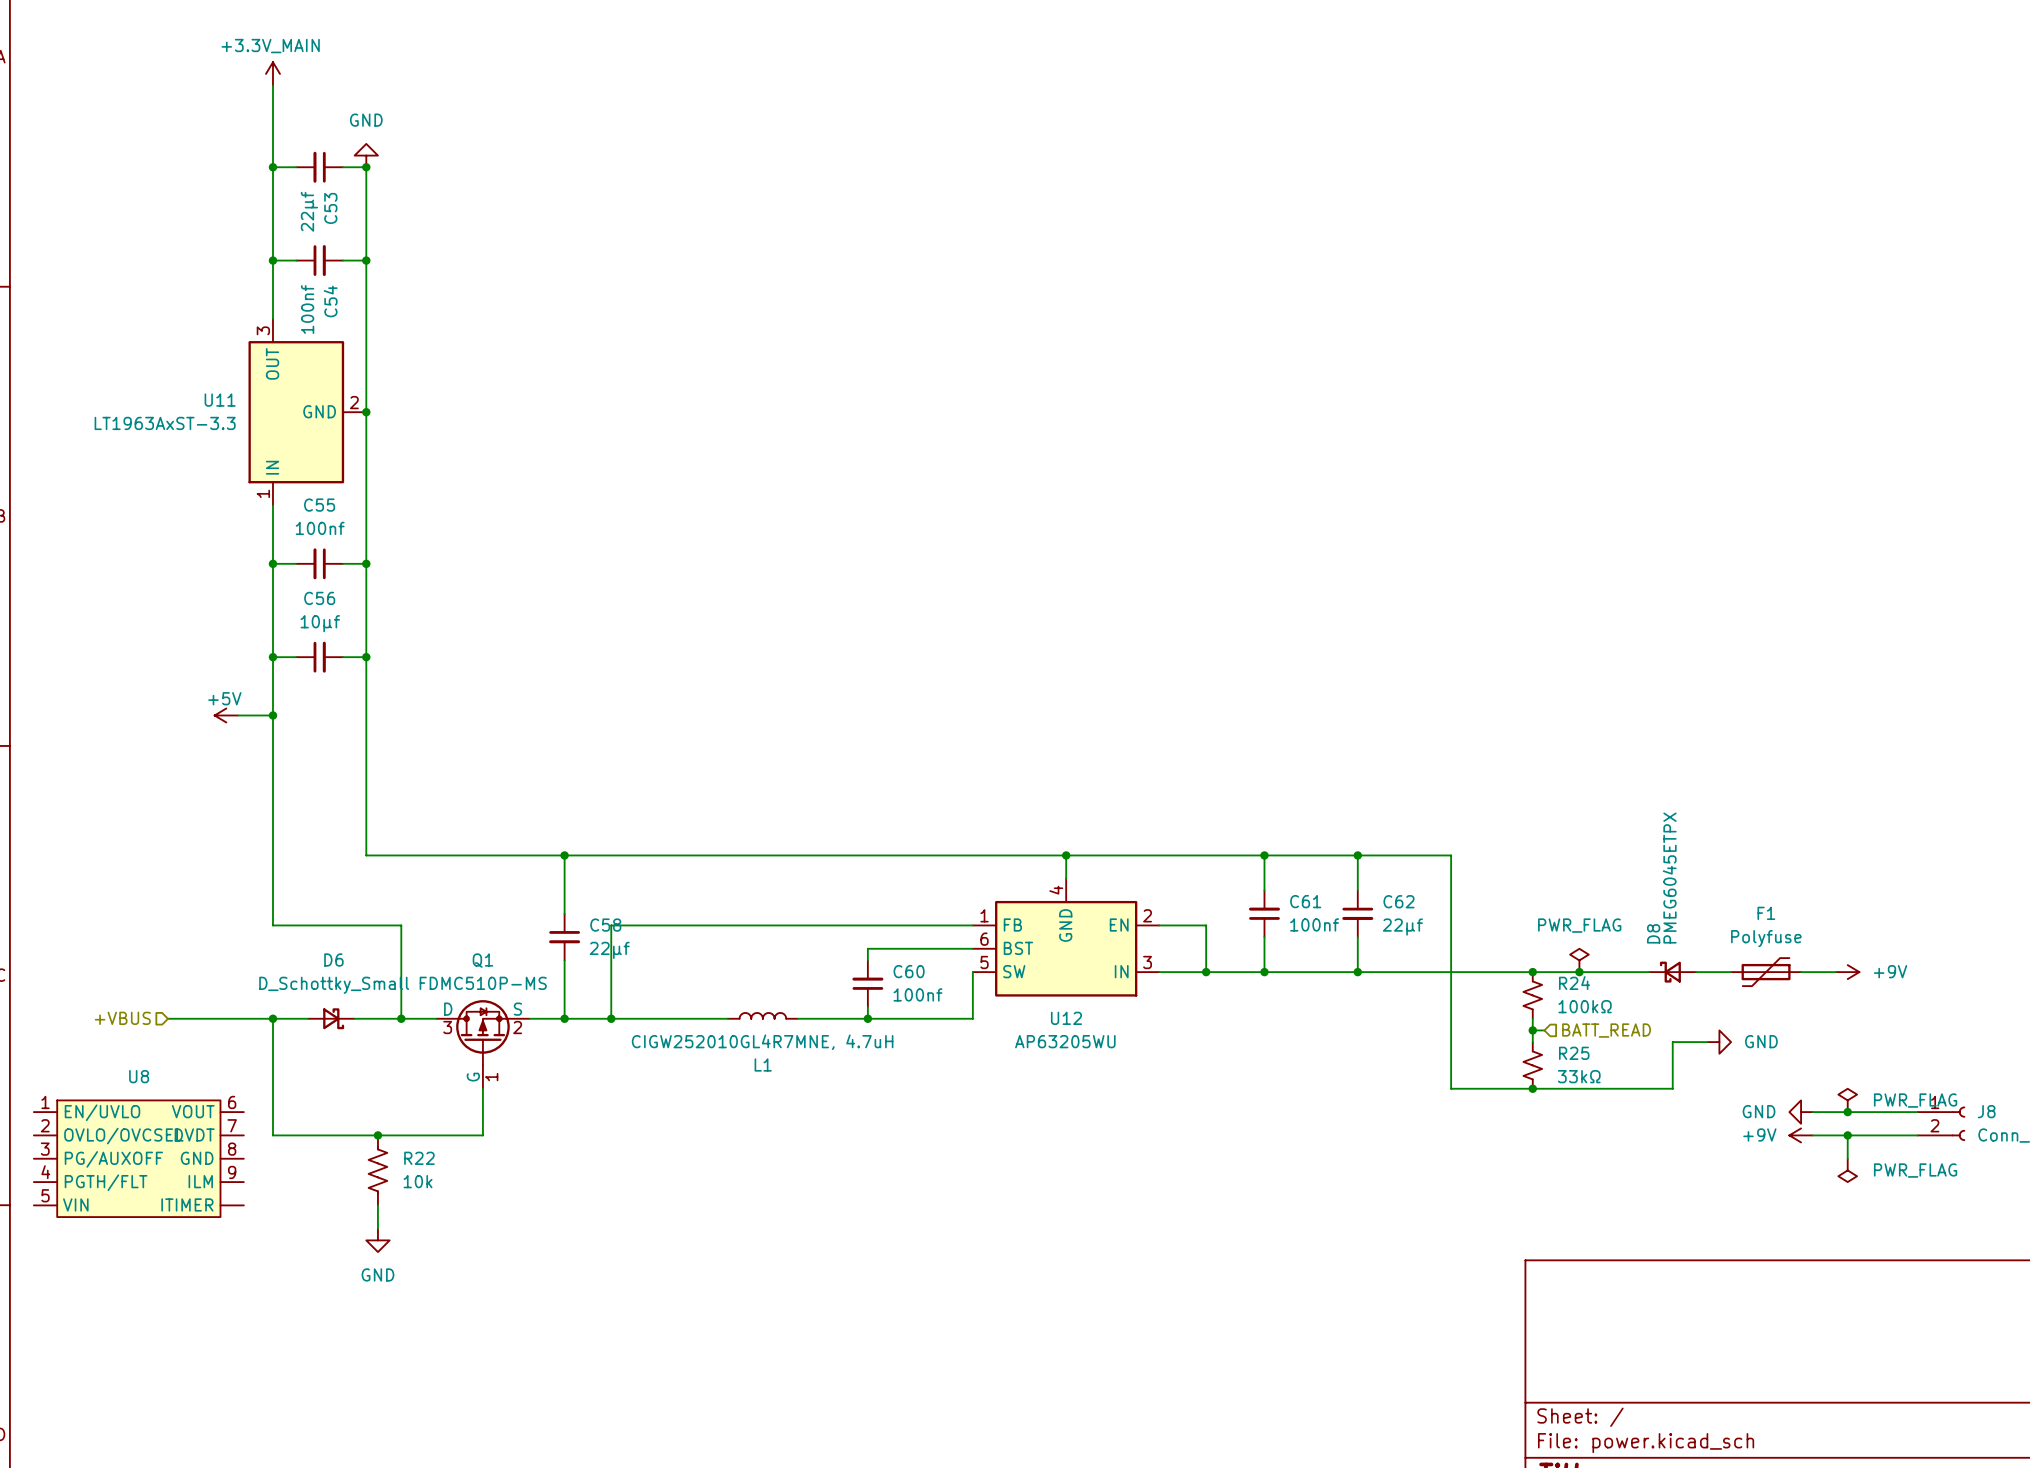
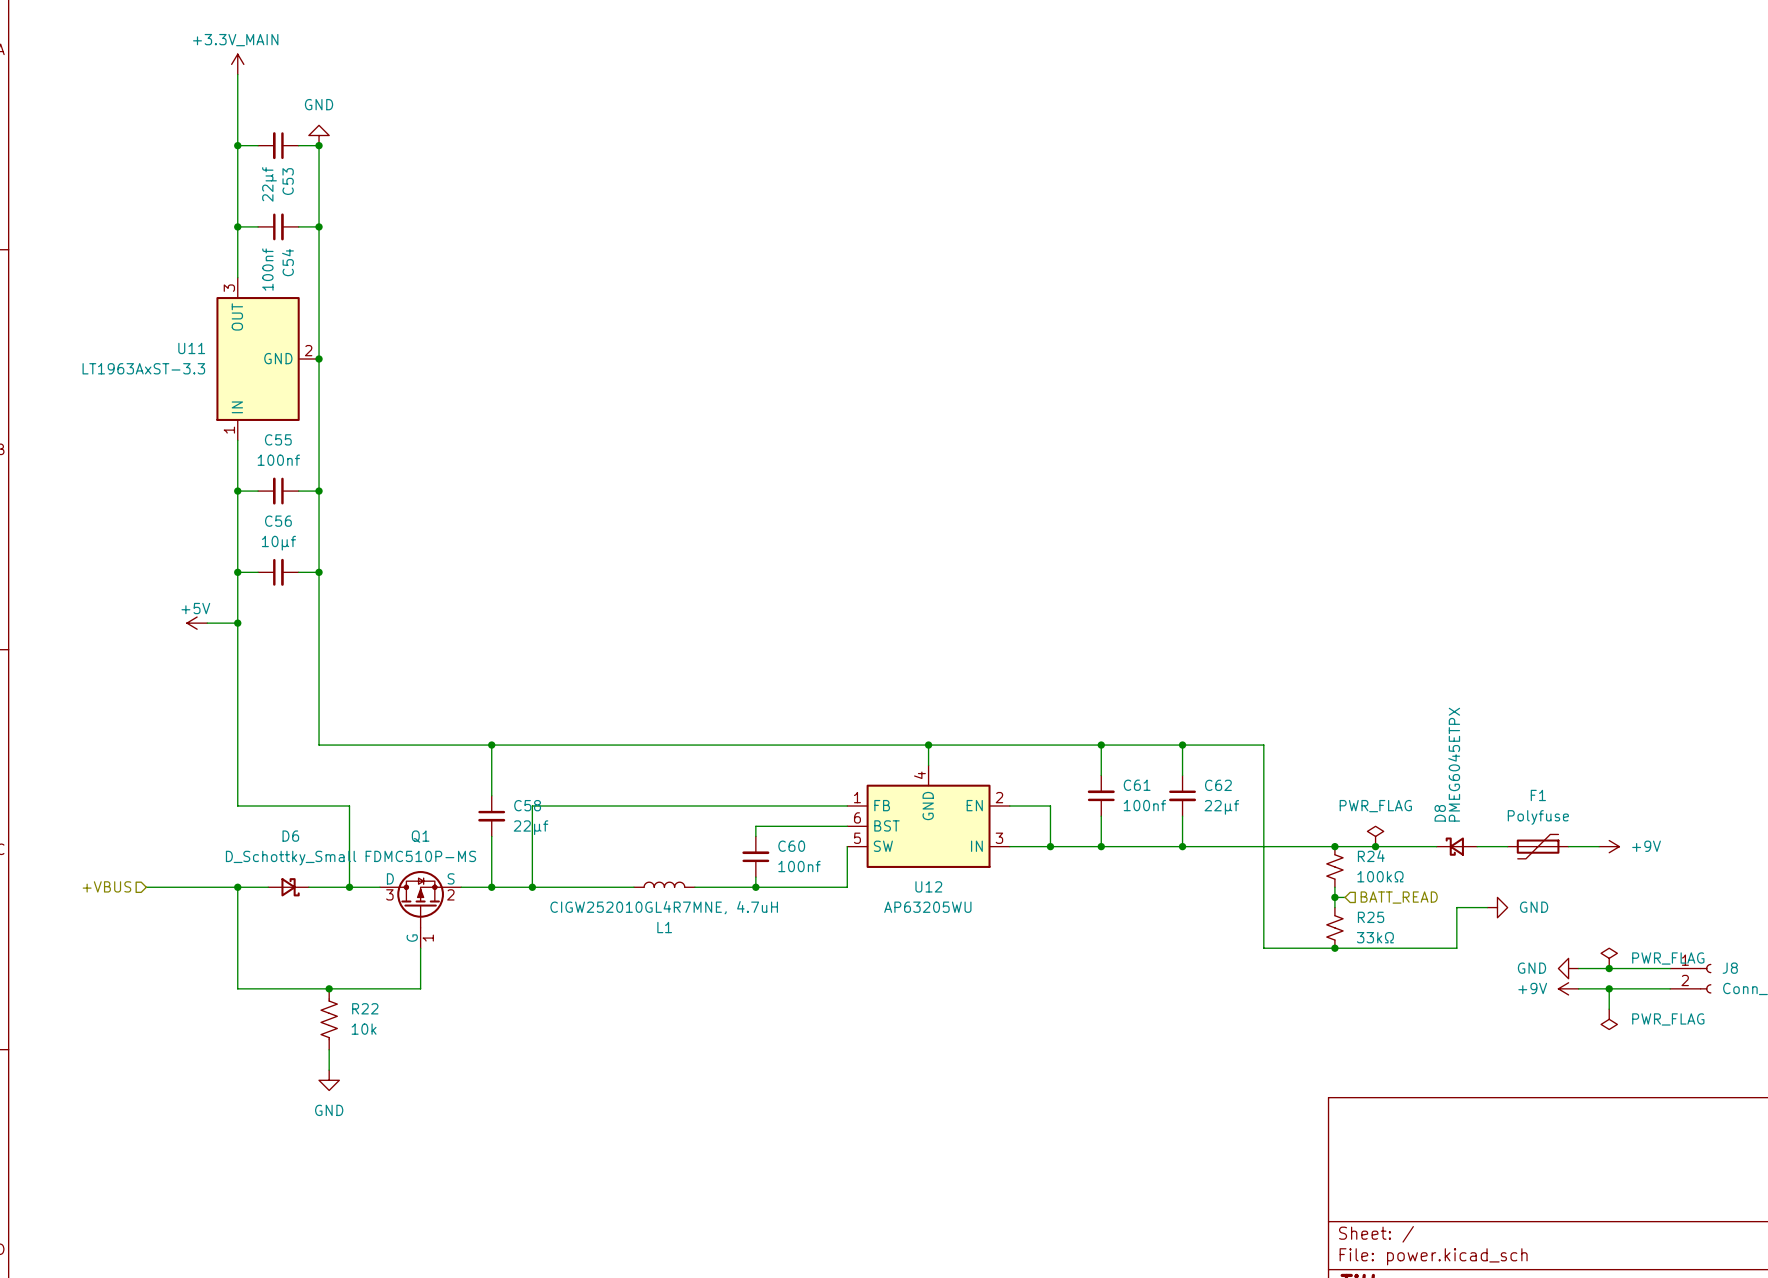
U8: (138, 1158) -> none

